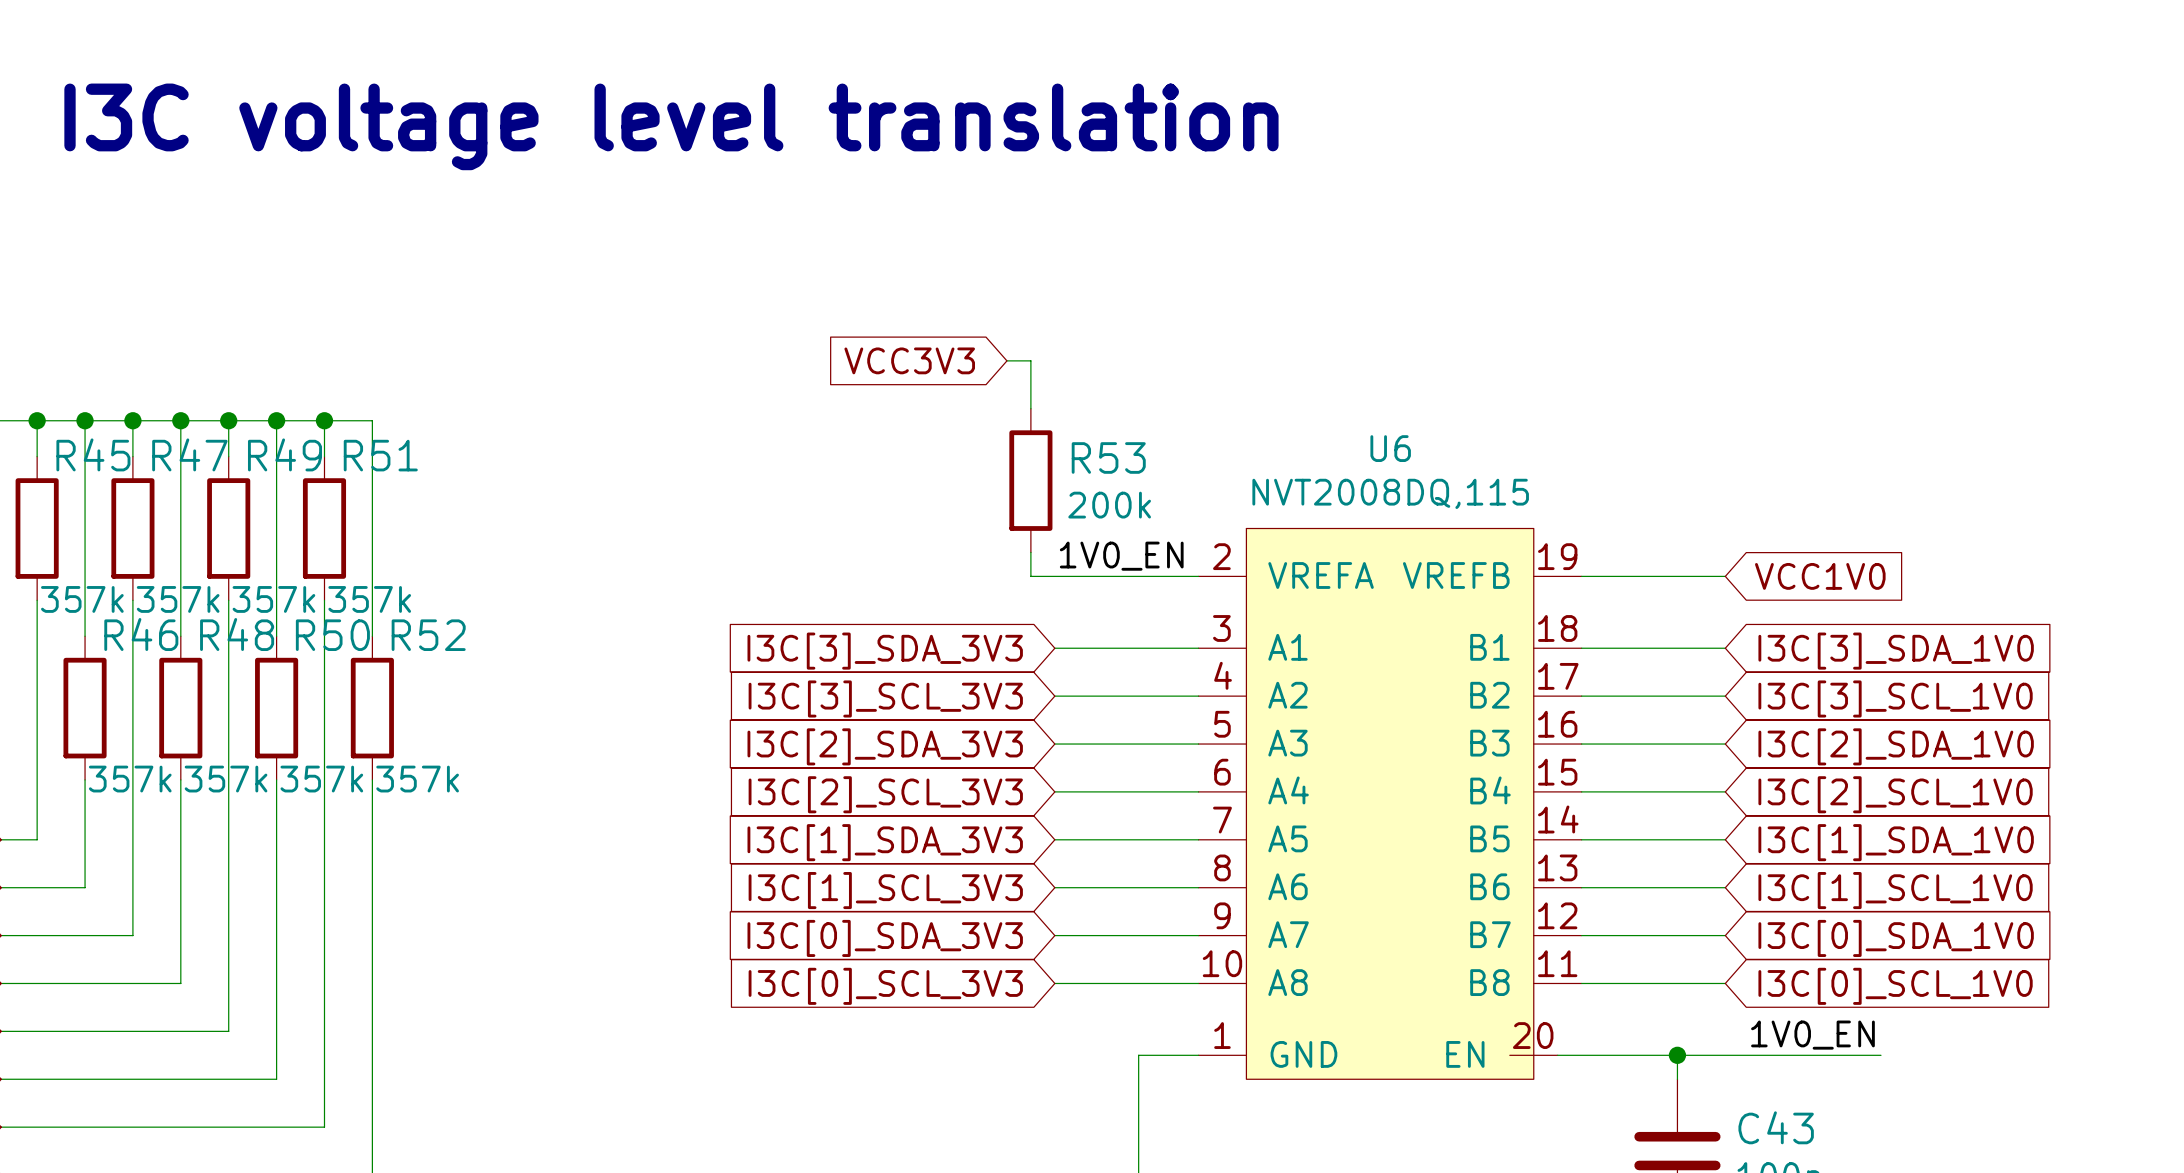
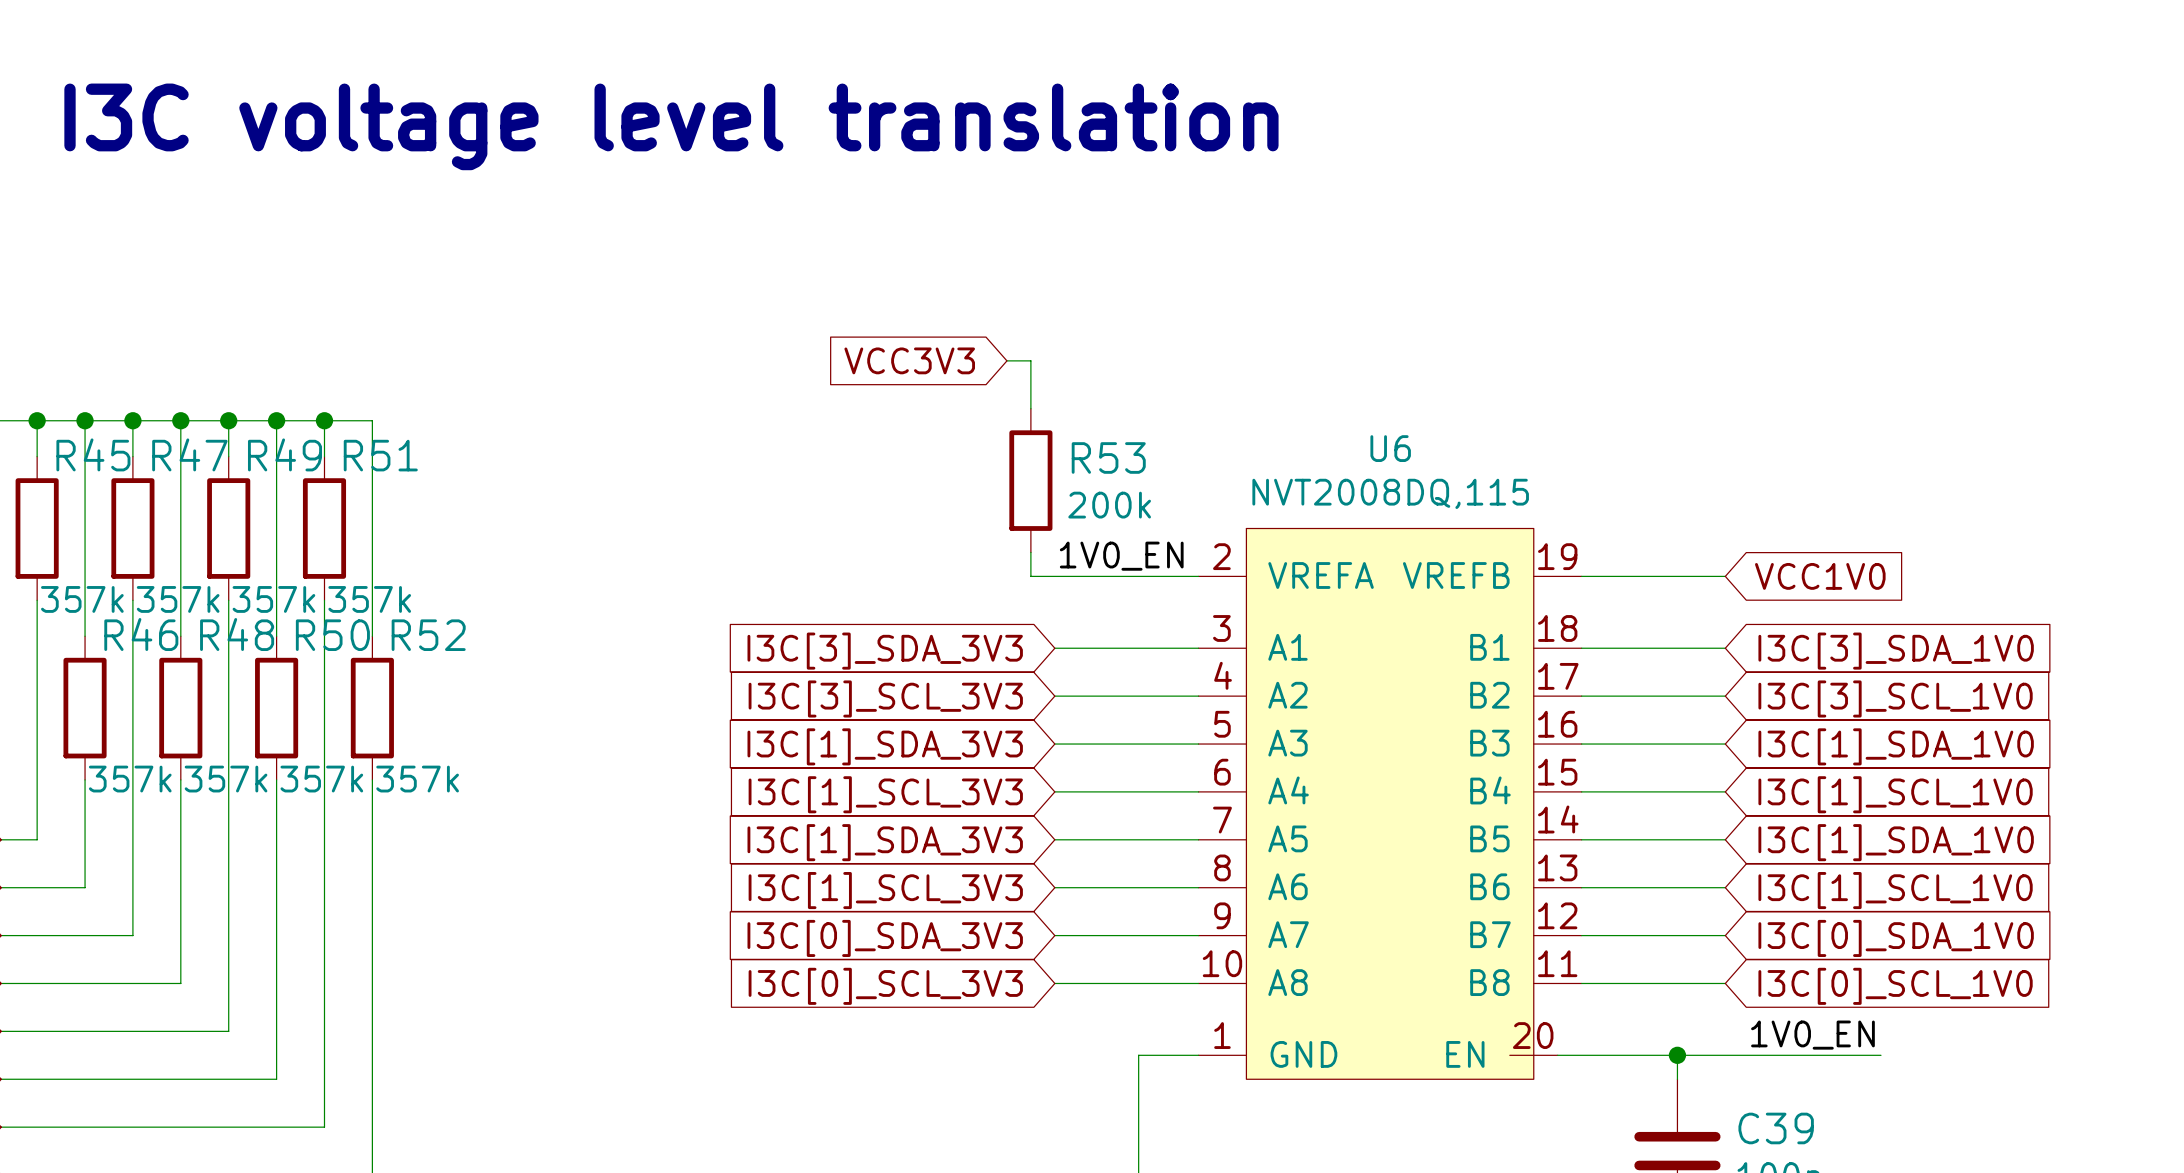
global label: I3C[2]_SDA_3V3 (885, 746) -> I3C[1]_SDA_3V3 (885, 746)
global label: I3C[2]_SDA_1V0 (1896, 746) -> I3C[1]_SDA_1V0 (1896, 746)
global label: I3C[2]_SCL_3V3 (885, 794) -> I3C[1]_SCL_3V3 (885, 794)
global label: I3C[2]_SCL_1V0 (1895, 794) -> I3C[1]_SCL_1V0 (1895, 794)
C43 name: C43 (1776, 1127) -> C39 (1776, 1128)

